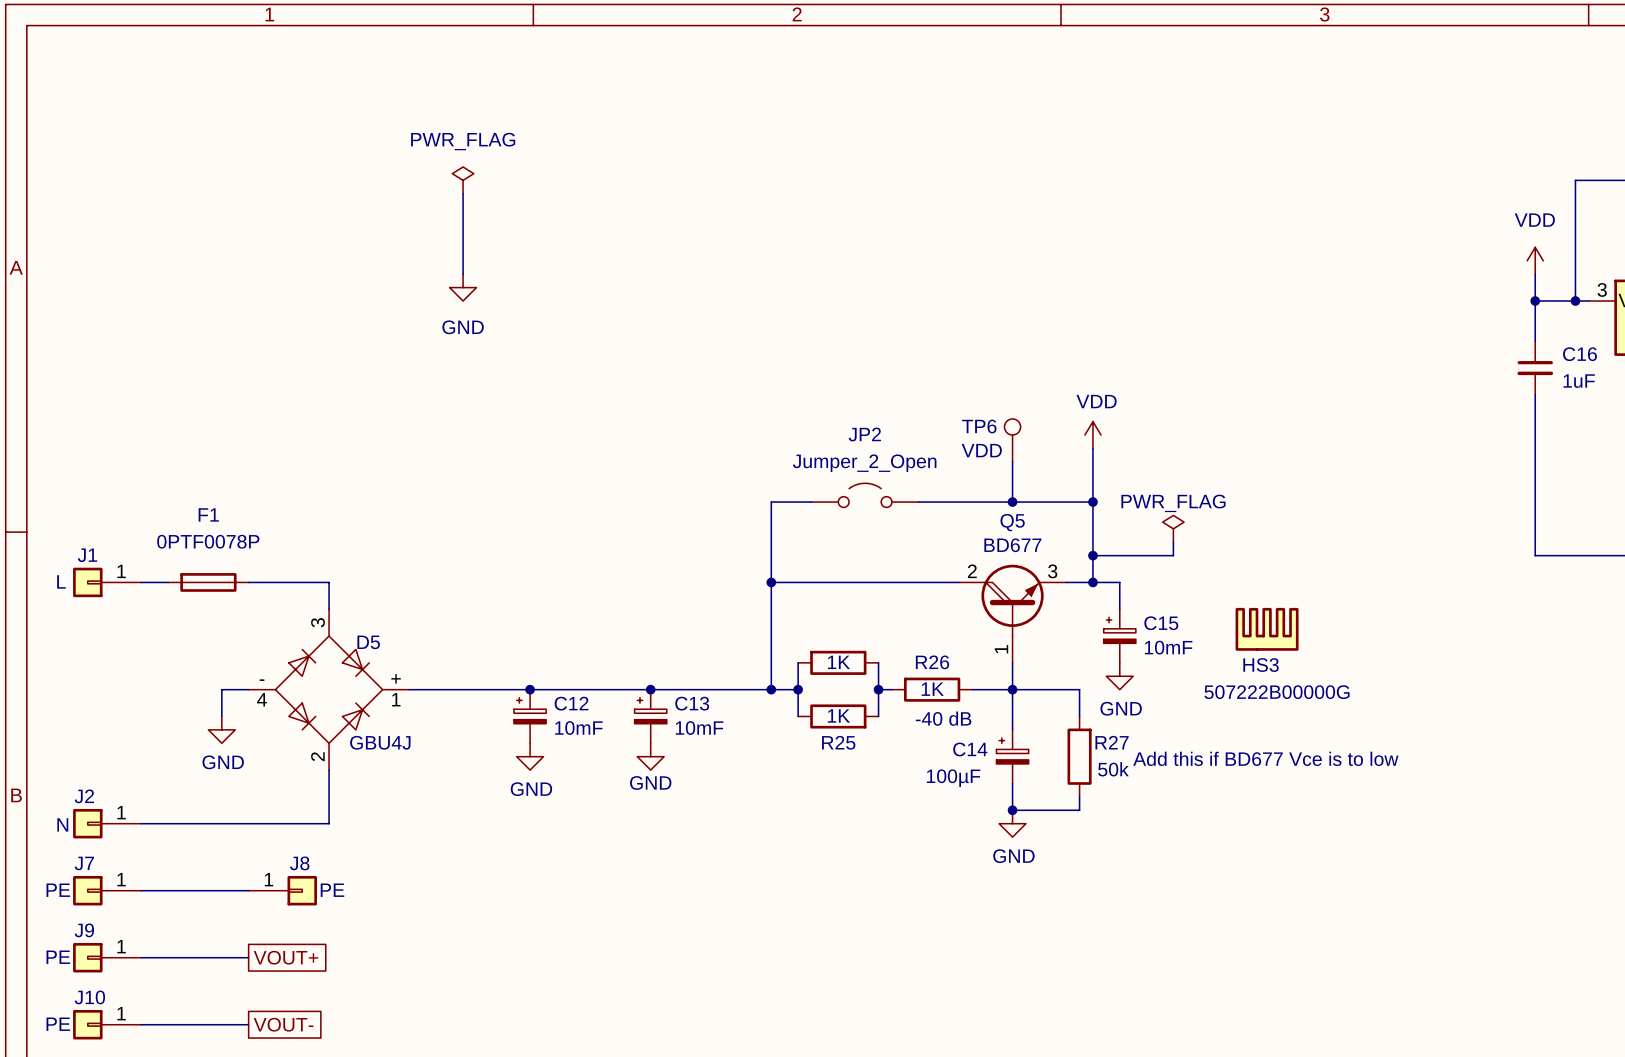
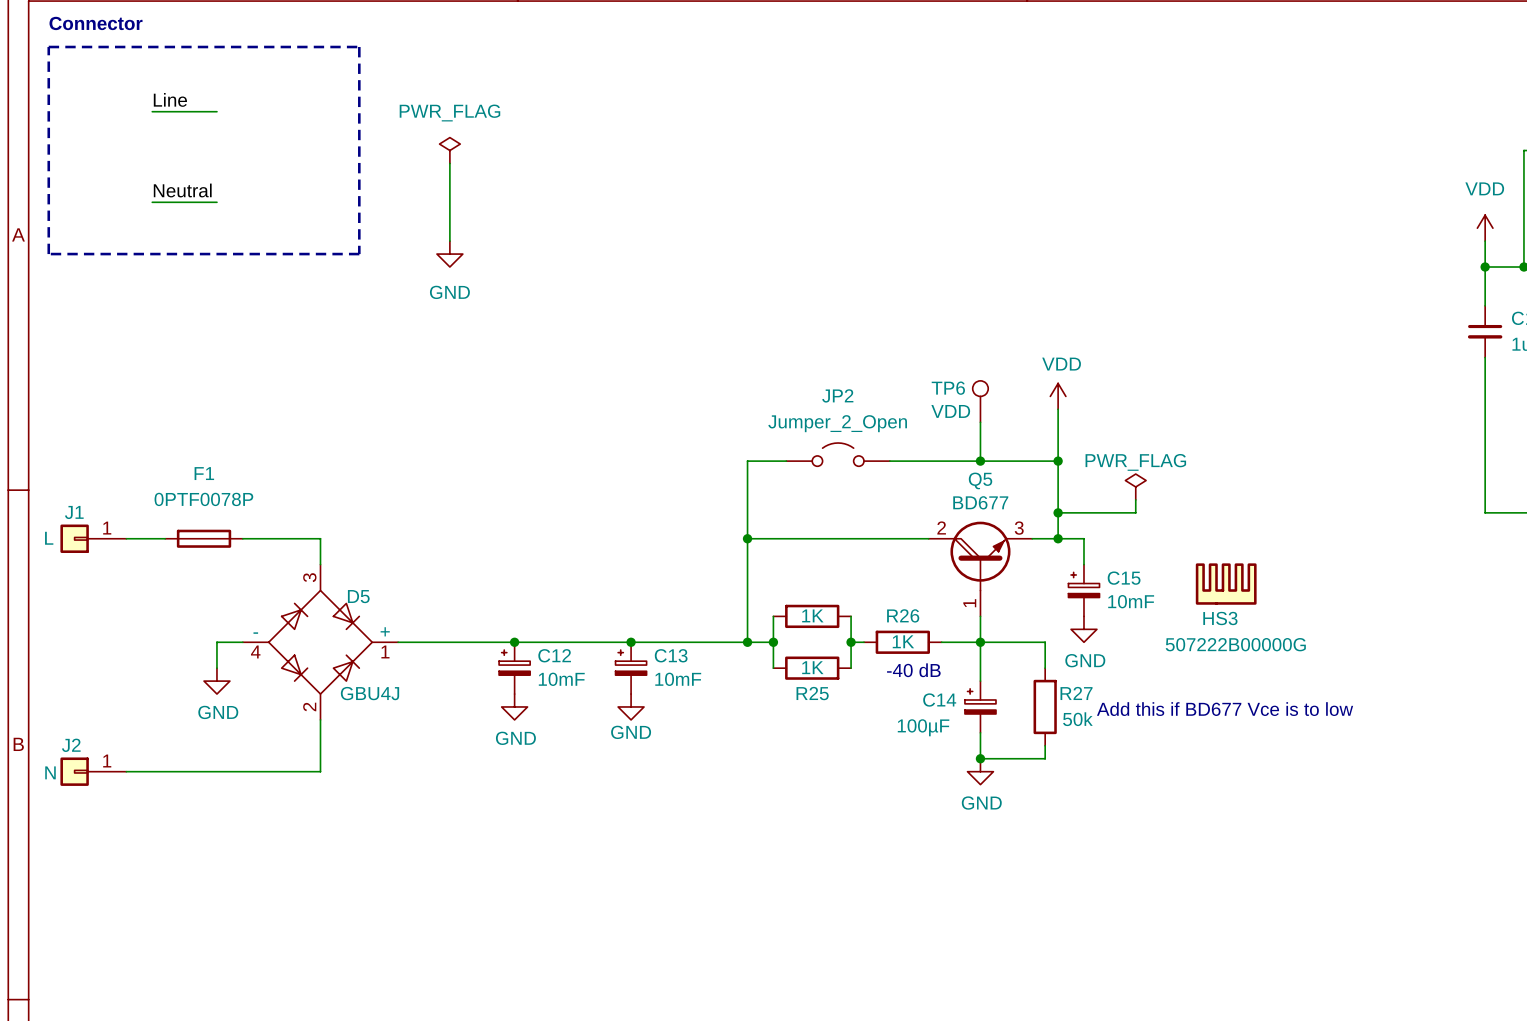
text: none -> Connector (96, 23)
line: none -> (48, 47) (359, 47) (359, 254) (48, 254) (48, 47)
label: none -> Line (170, 99)
wire: none -> (152, 111) (216, 111)
label: none -> Neutral (182, 190)
wire: none -> (152, 202) (216, 202)
J1 position: (107, 582) -> (93, 538)
J2 position: (107, 823) -> (93, 771)
J7: PE (107, 890) -> none
wire: (141, 890) (248, 890) -> none
J8: PE (282, 890) -> none
J9: PE (107, 957) -> none
wire: (141, 957) (248, 957) -> none
global label: VOUT+ (285, 957) -> none
J10: PE (107, 1024) -> none
wire: (141, 1024) (248, 1024) -> none
global label: VOUT- (283, 1024) -> none

